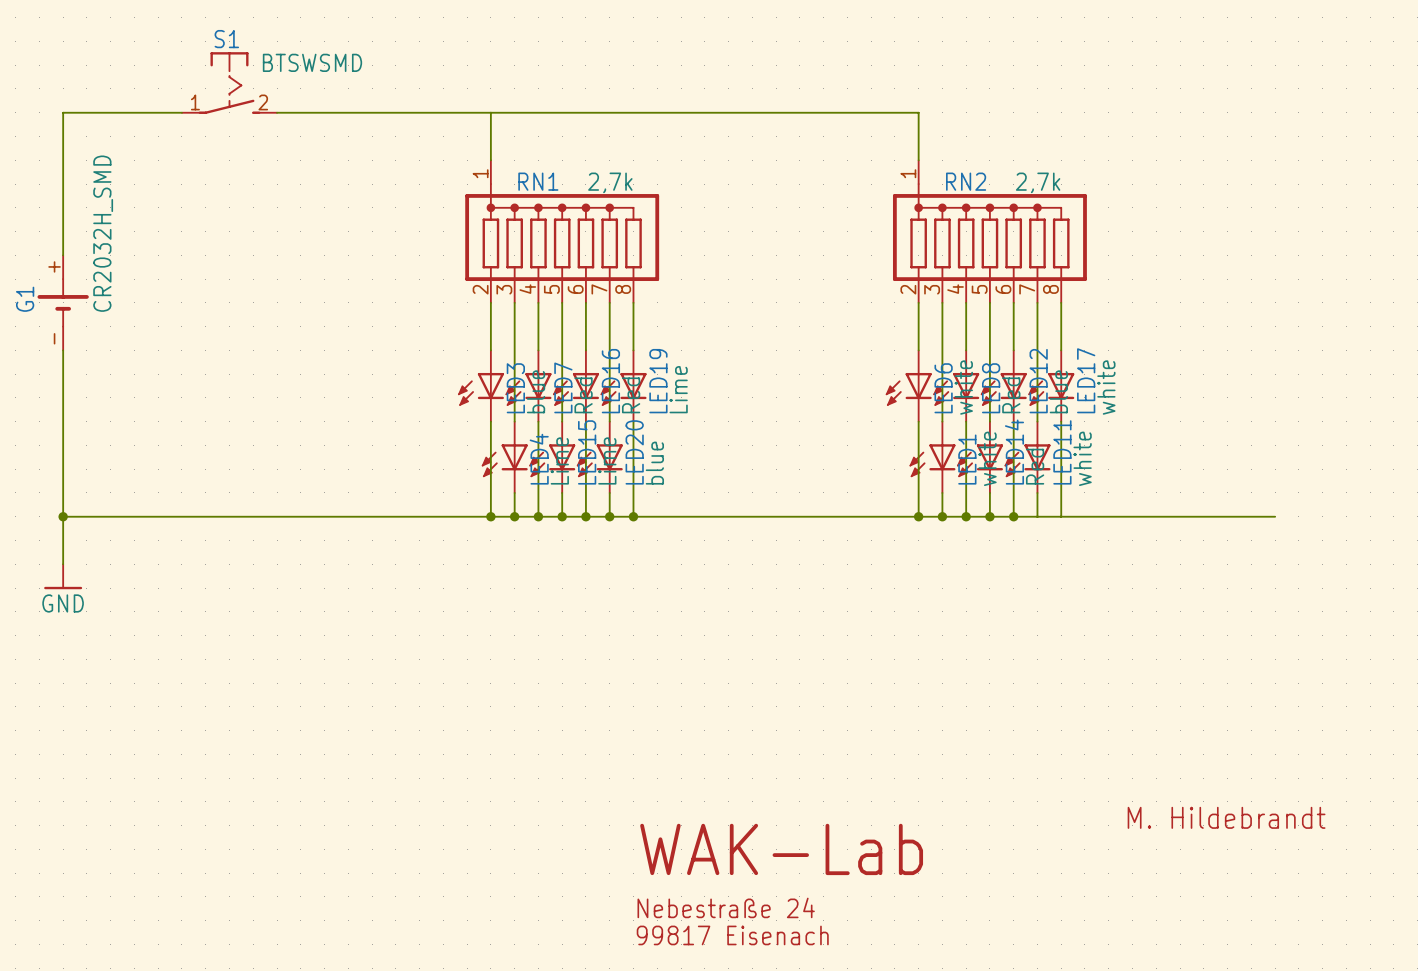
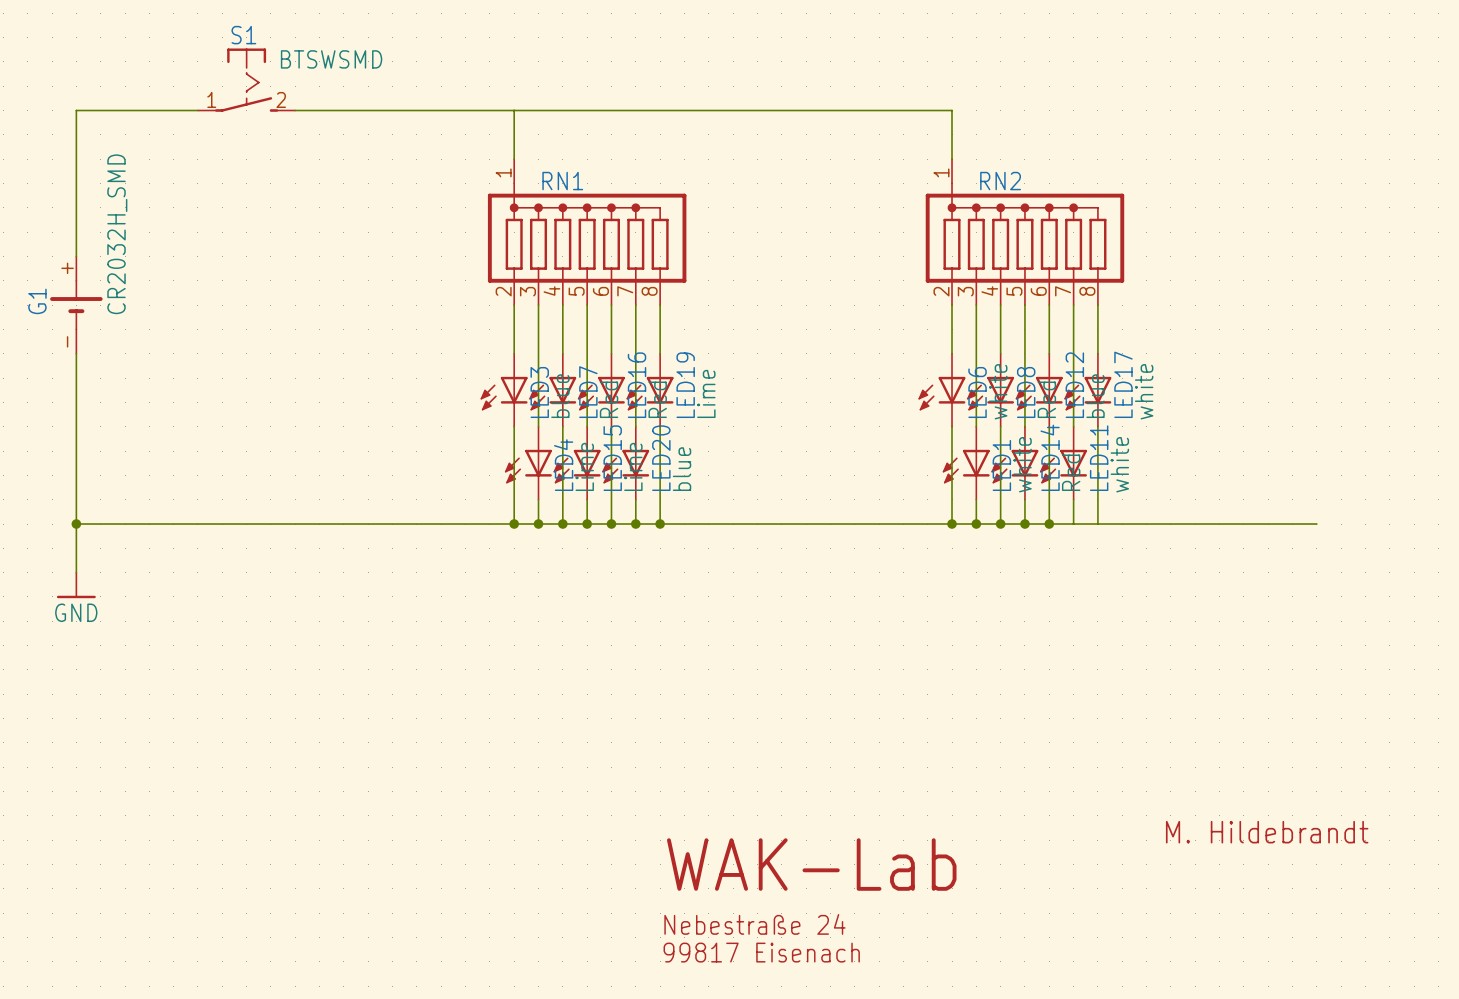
RN1 value: 2,7k (610, 182) -> none
RN2 value: 2,7k (1038, 182) -> none

